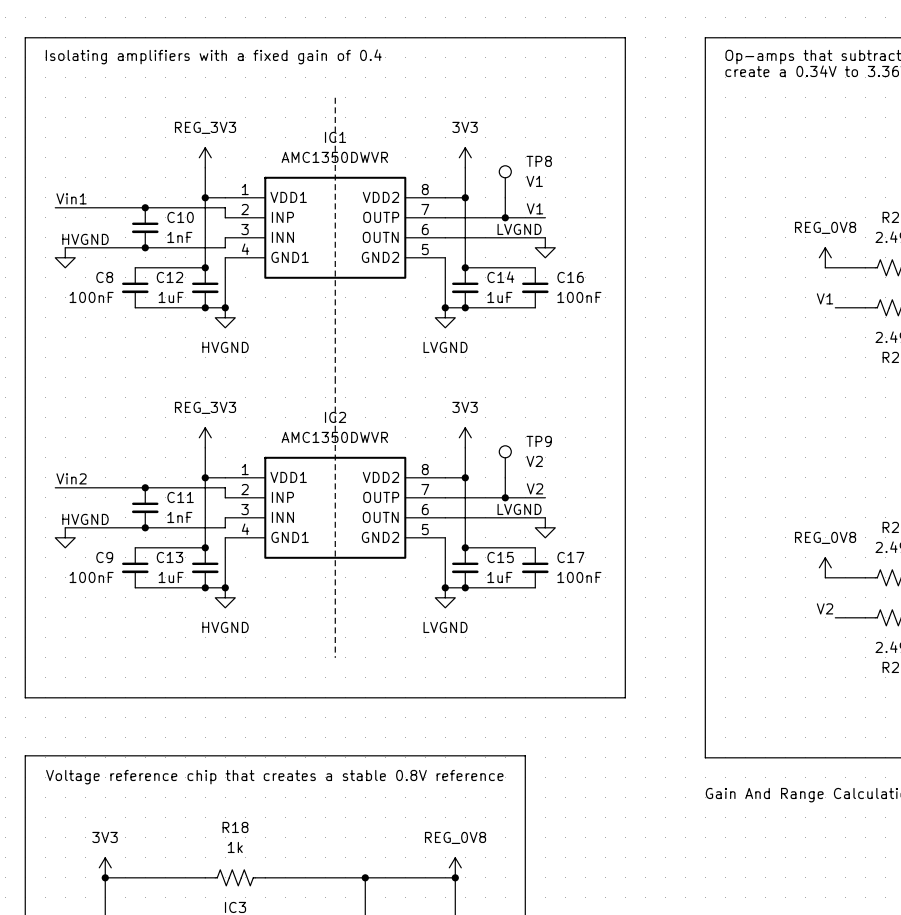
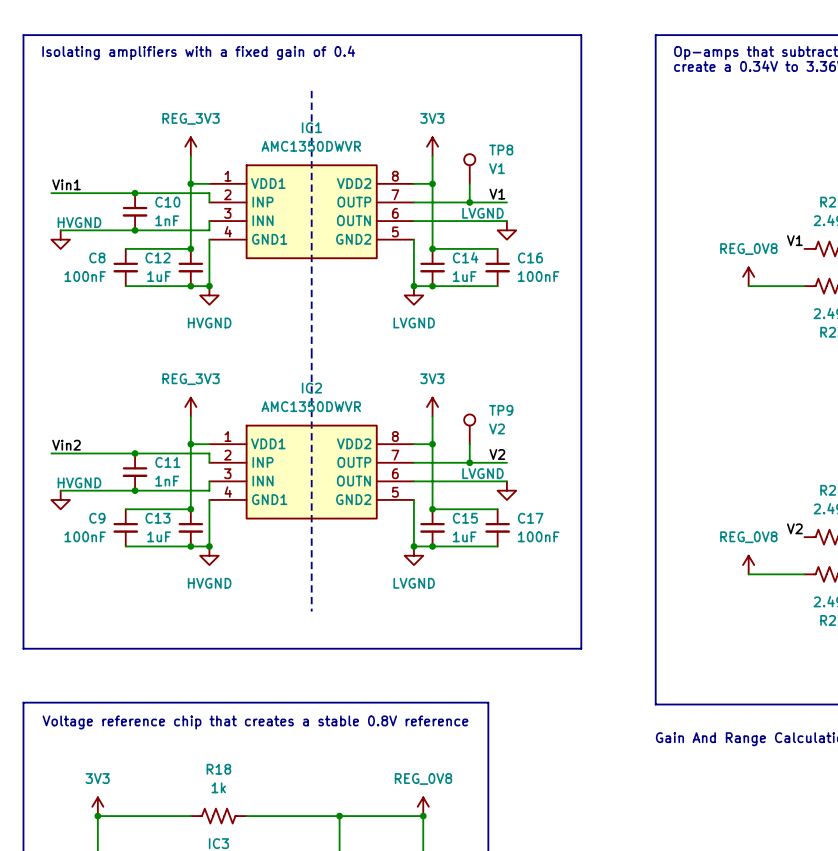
power symbol position: REG_0V8 (825, 257) -> REG_0V8 (748, 276)
wire: (825, 267) (865, 267) -> none
label position: V1 (825, 298) -> V1 (794, 240)
wire: none -> (748, 286) (776, 286)
power symbol position: REG_0V8 (825, 567) -> REG_0V8 (748, 565)
wire: (825, 577) (865, 577) -> none
label position: V2 (825, 608) -> V2 (794, 528)
wire: none -> (748, 574) (776, 574)

